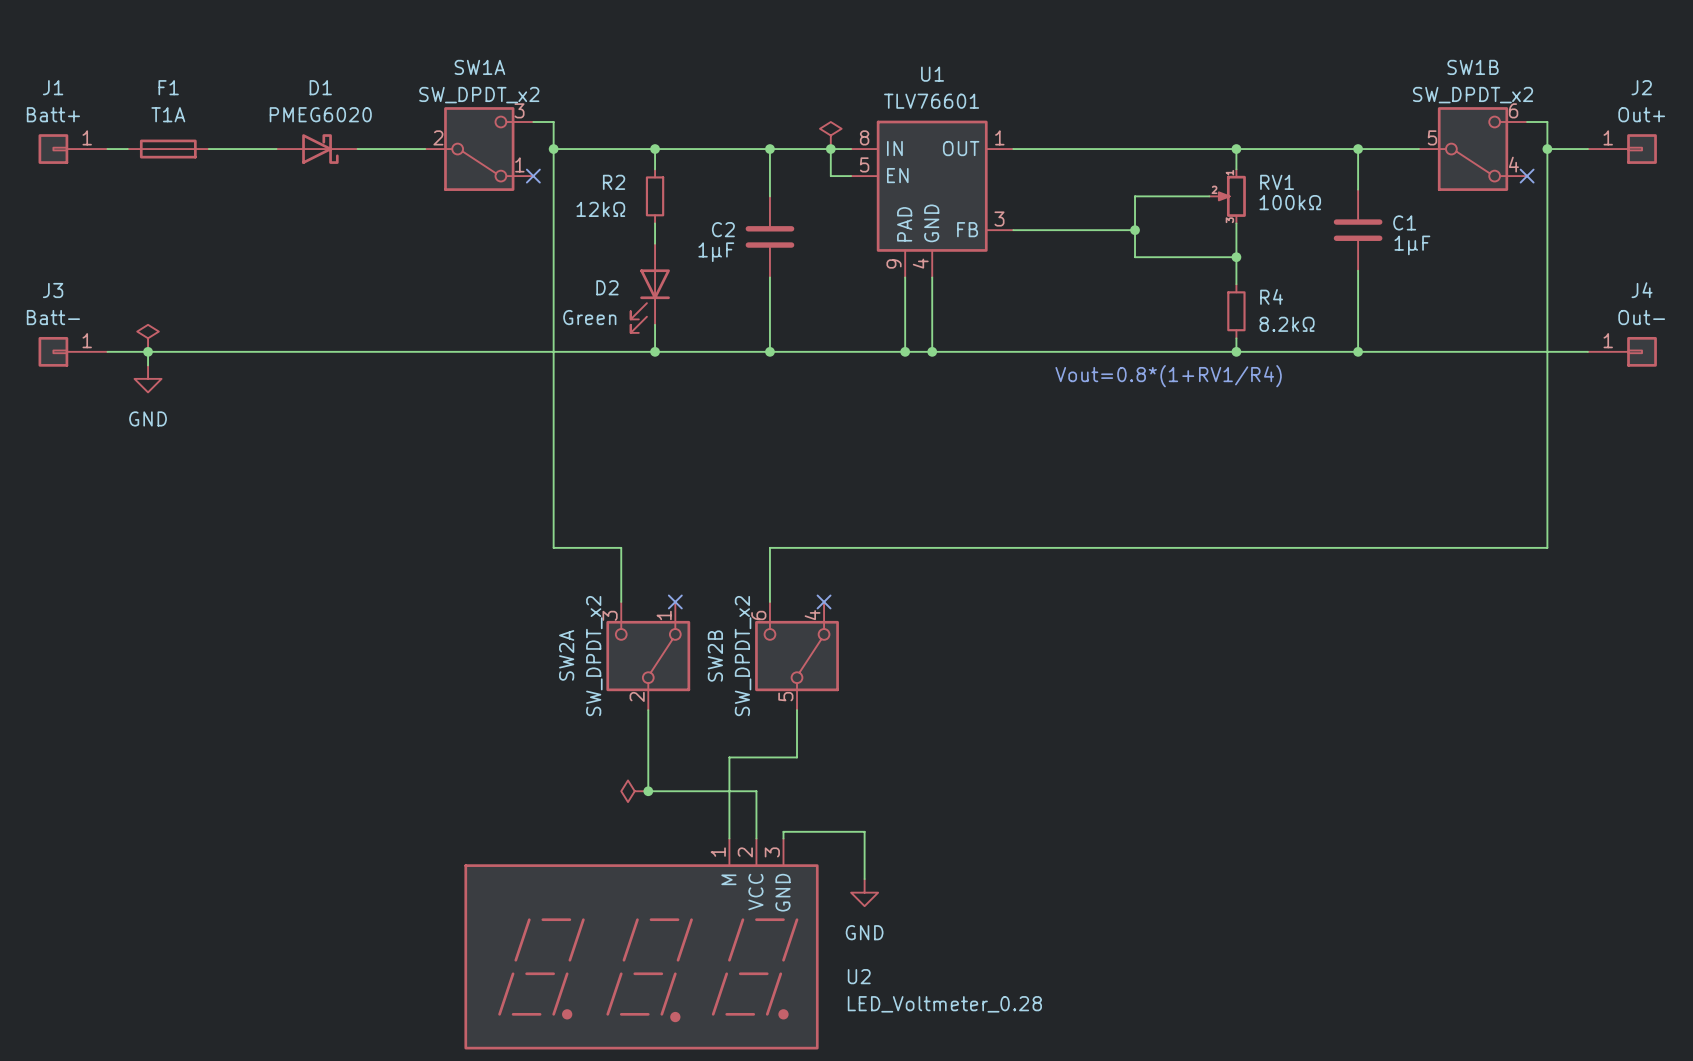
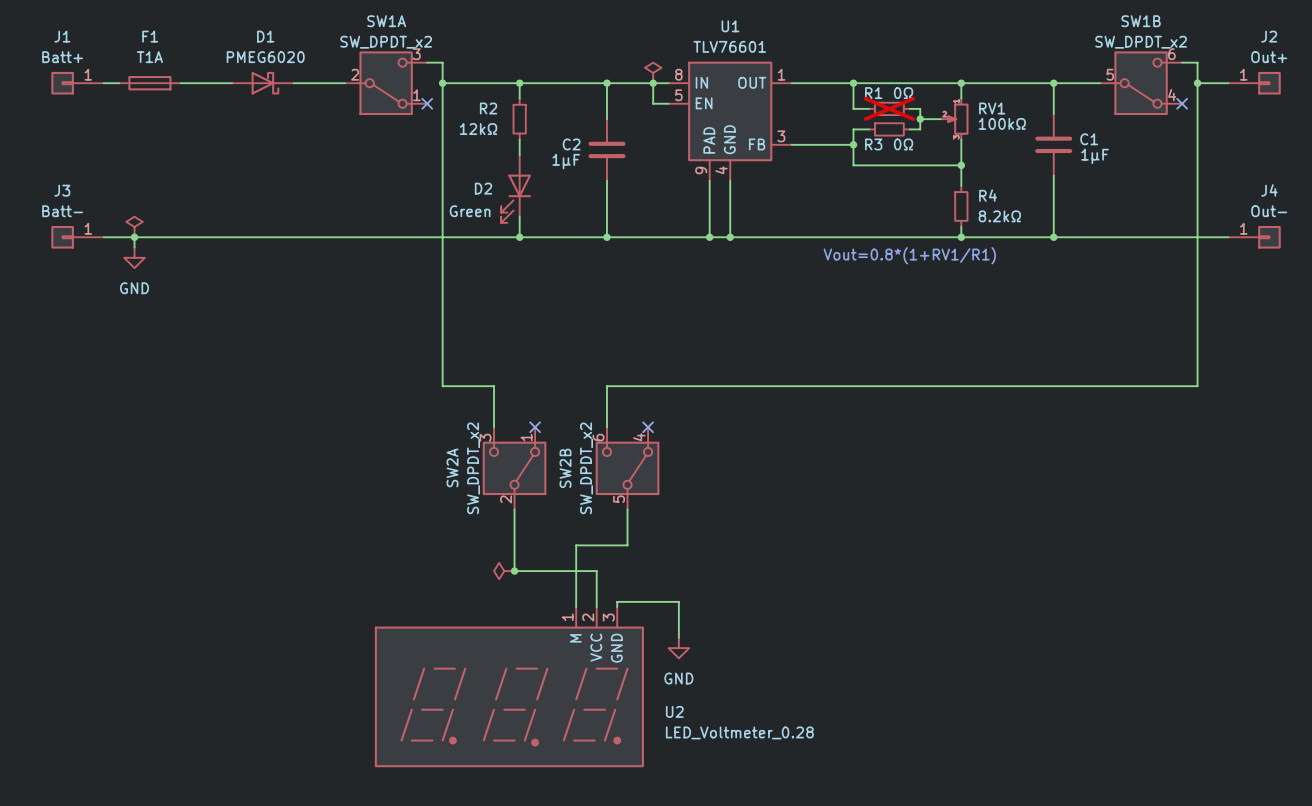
wire: none -> (853, 83) (853, 108) (868, 108)
junction: none -> (853, 83)
R1: none -> 0Ω (889, 108)
wire: none -> (909, 108) (920, 108) (920, 129) (909, 129)
wire: (1182, 196) (1135, 196) (1135, 257) -> (868, 129) (853, 129) (853, 165) (884, 165)
junction: none -> (920, 119)
R3: none -> 0Ω (889, 129)
wire: (1094, 230) (1135, 230) -> none
junction: none -> (853, 144)
junction: (1135, 230) -> none
text: Vout=0.8*(1+RV1/R4) (1168, 376) -> Vout=0.8*(1+RV1/R1) (909, 255)

